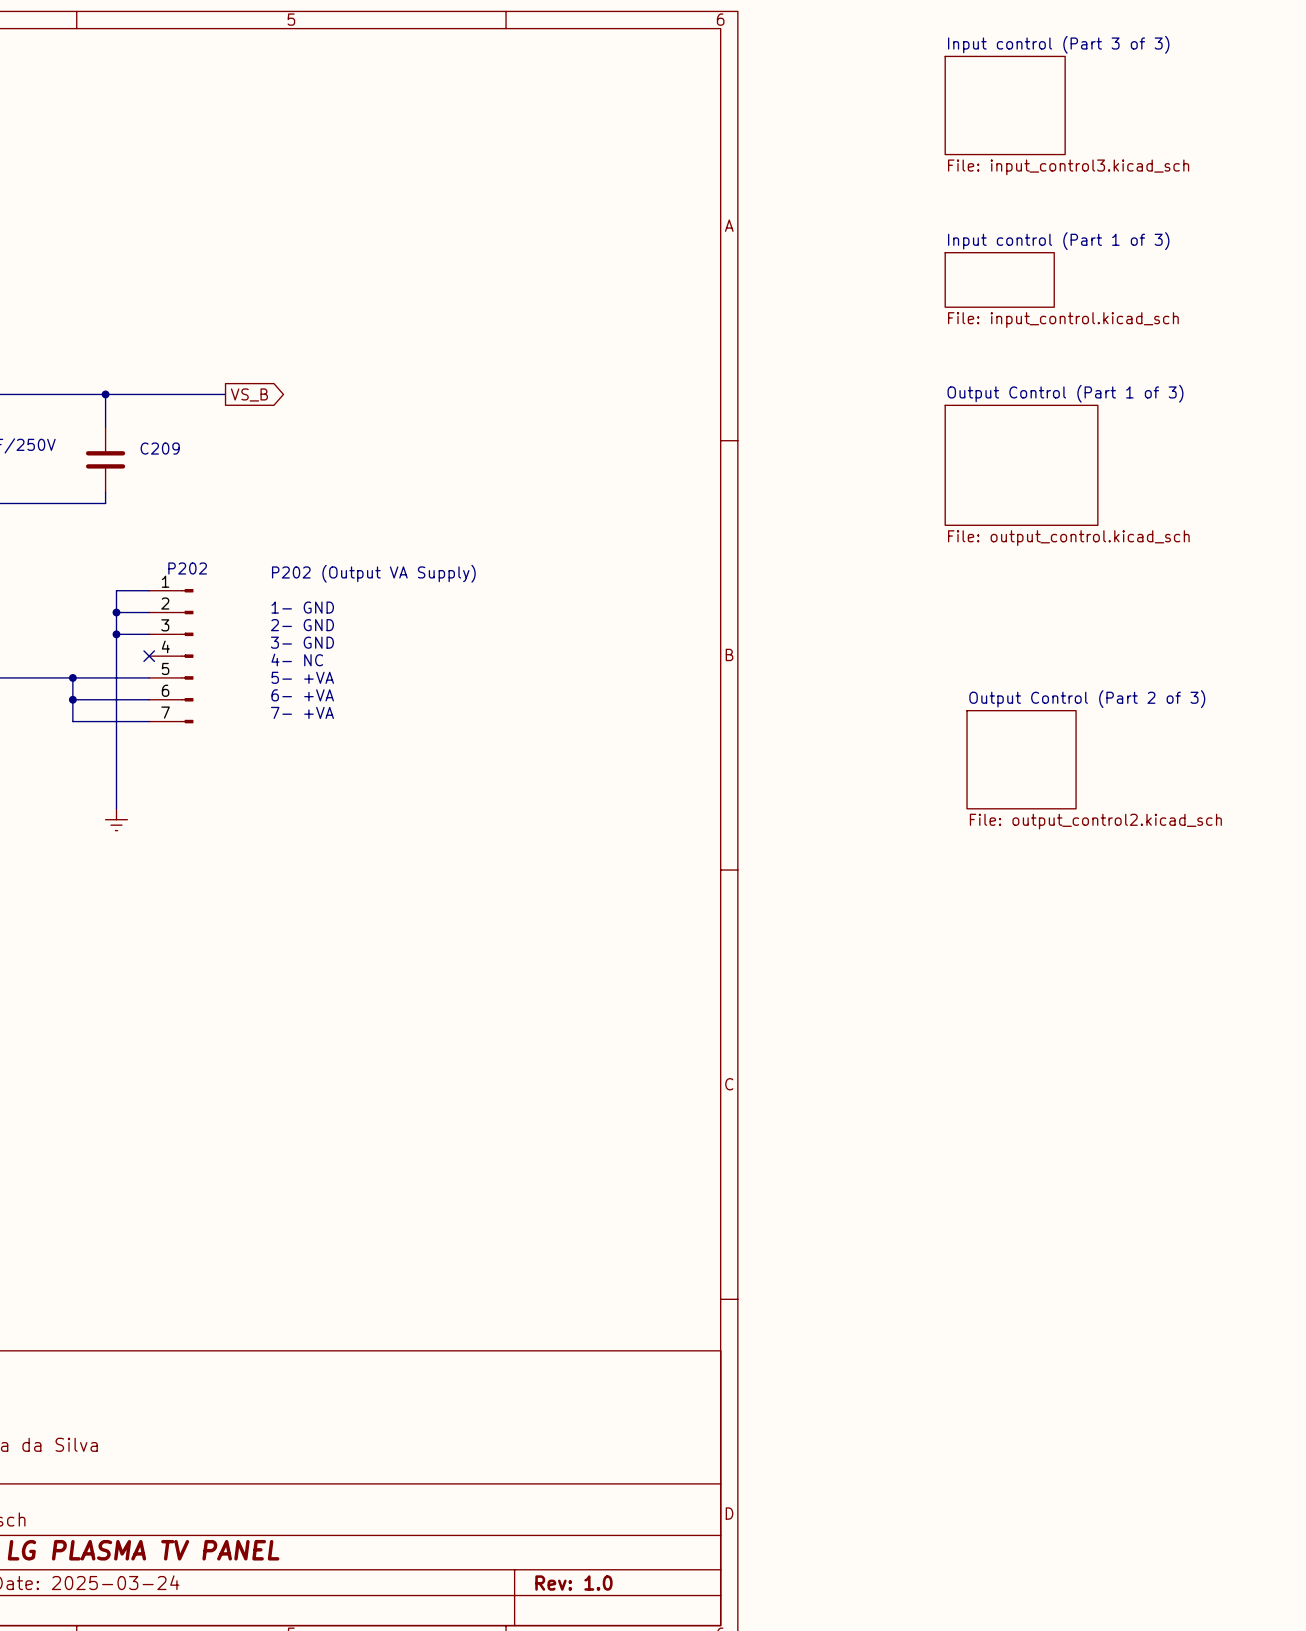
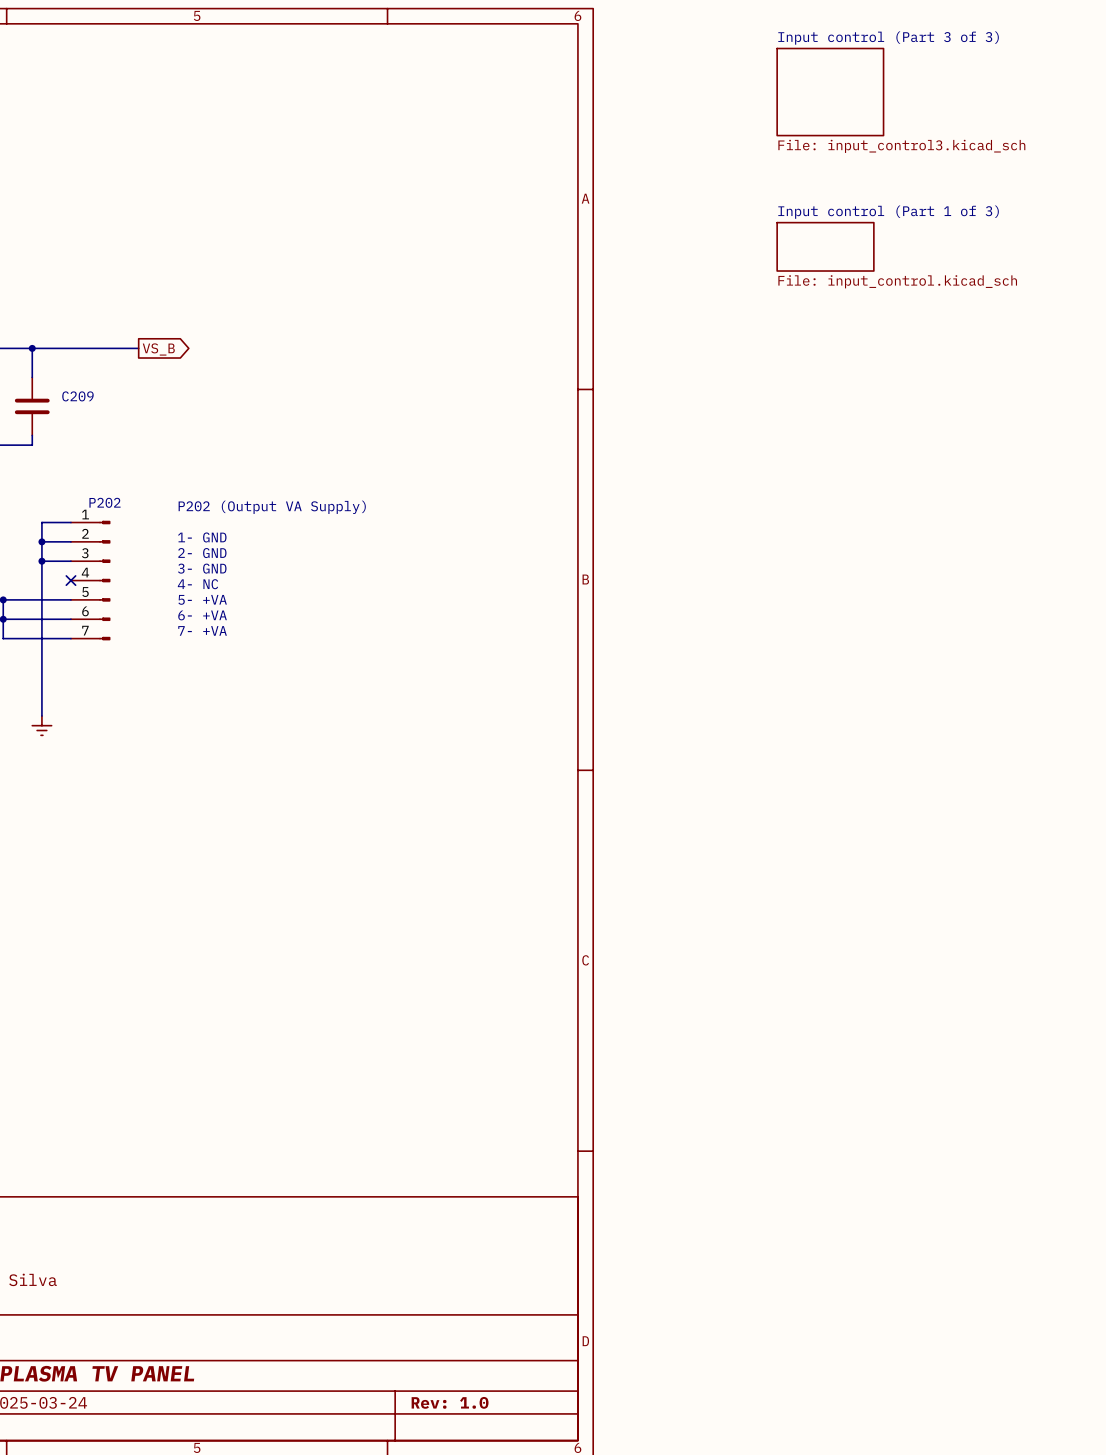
sheet Output Control (Part 1 of 3): File: output_control.kicad_sch (1021, 465) -> none
sheet Output Control (Part 2 of 3): File: output_control2.kicad_sch (1021, 759) -> none

